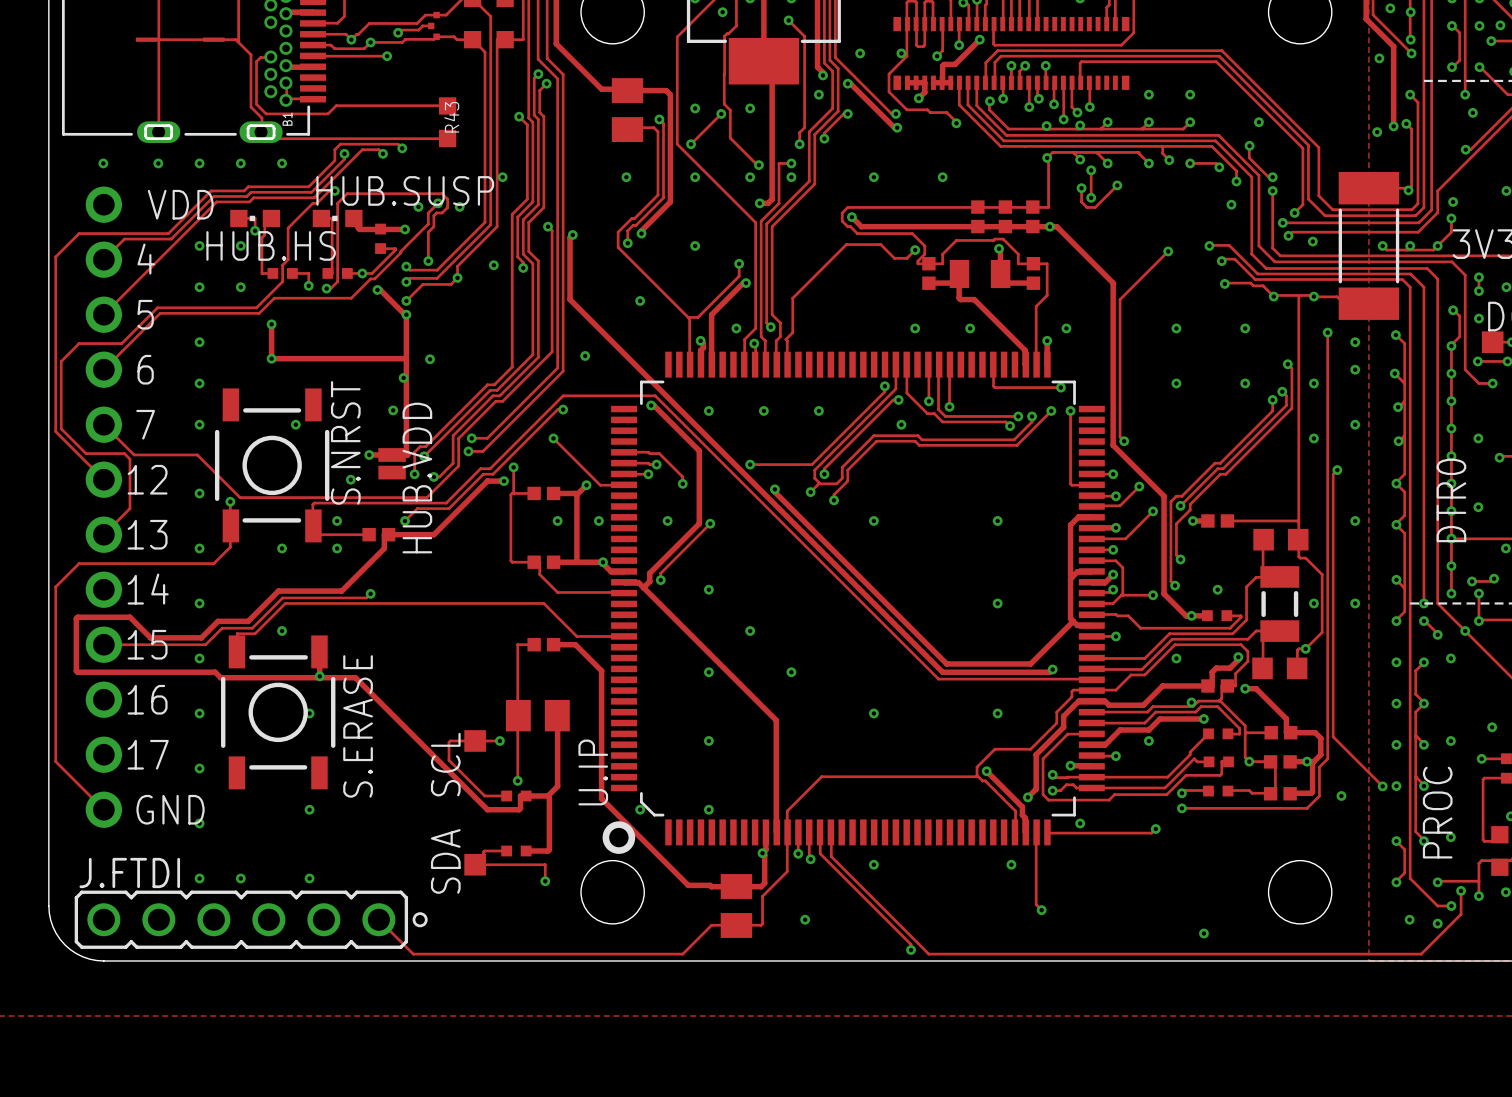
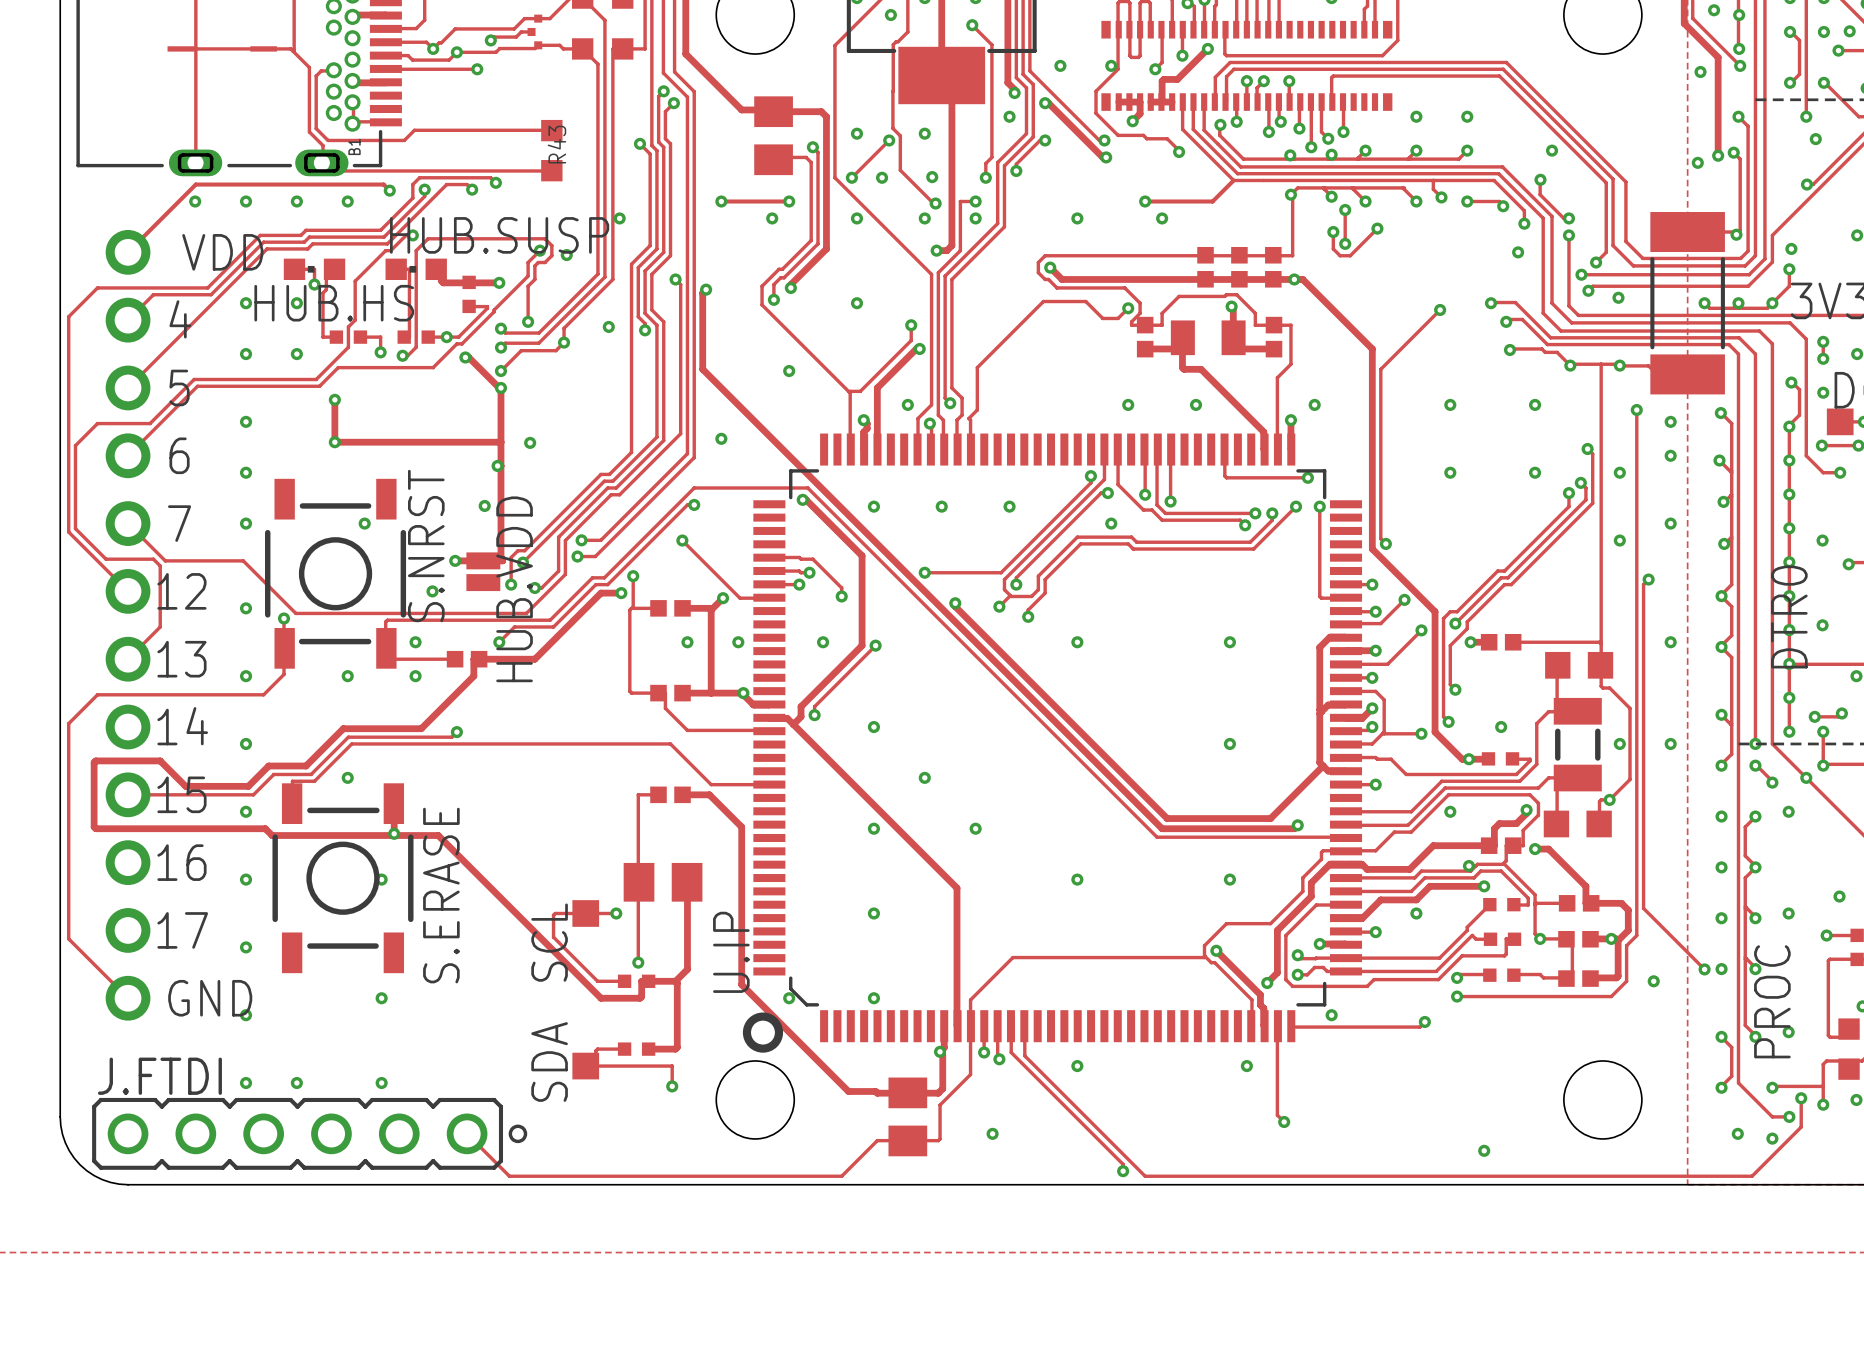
via: none -> (932, 177)
via: none -> (882, 177)
track: none -> (1233, 180) (1212, 201) (1145, 201)
track: none -> (389, 190) (383, 184) (195, 184) (128, 252)
via: none -> (389, 190)
via: (103, 163) -> none
track: none -> (721, 201) (789, 201)
via: none -> (721, 201)
via: none -> (789, 201)
via: none -> (1145, 201)
via: (418, 206) -> none

